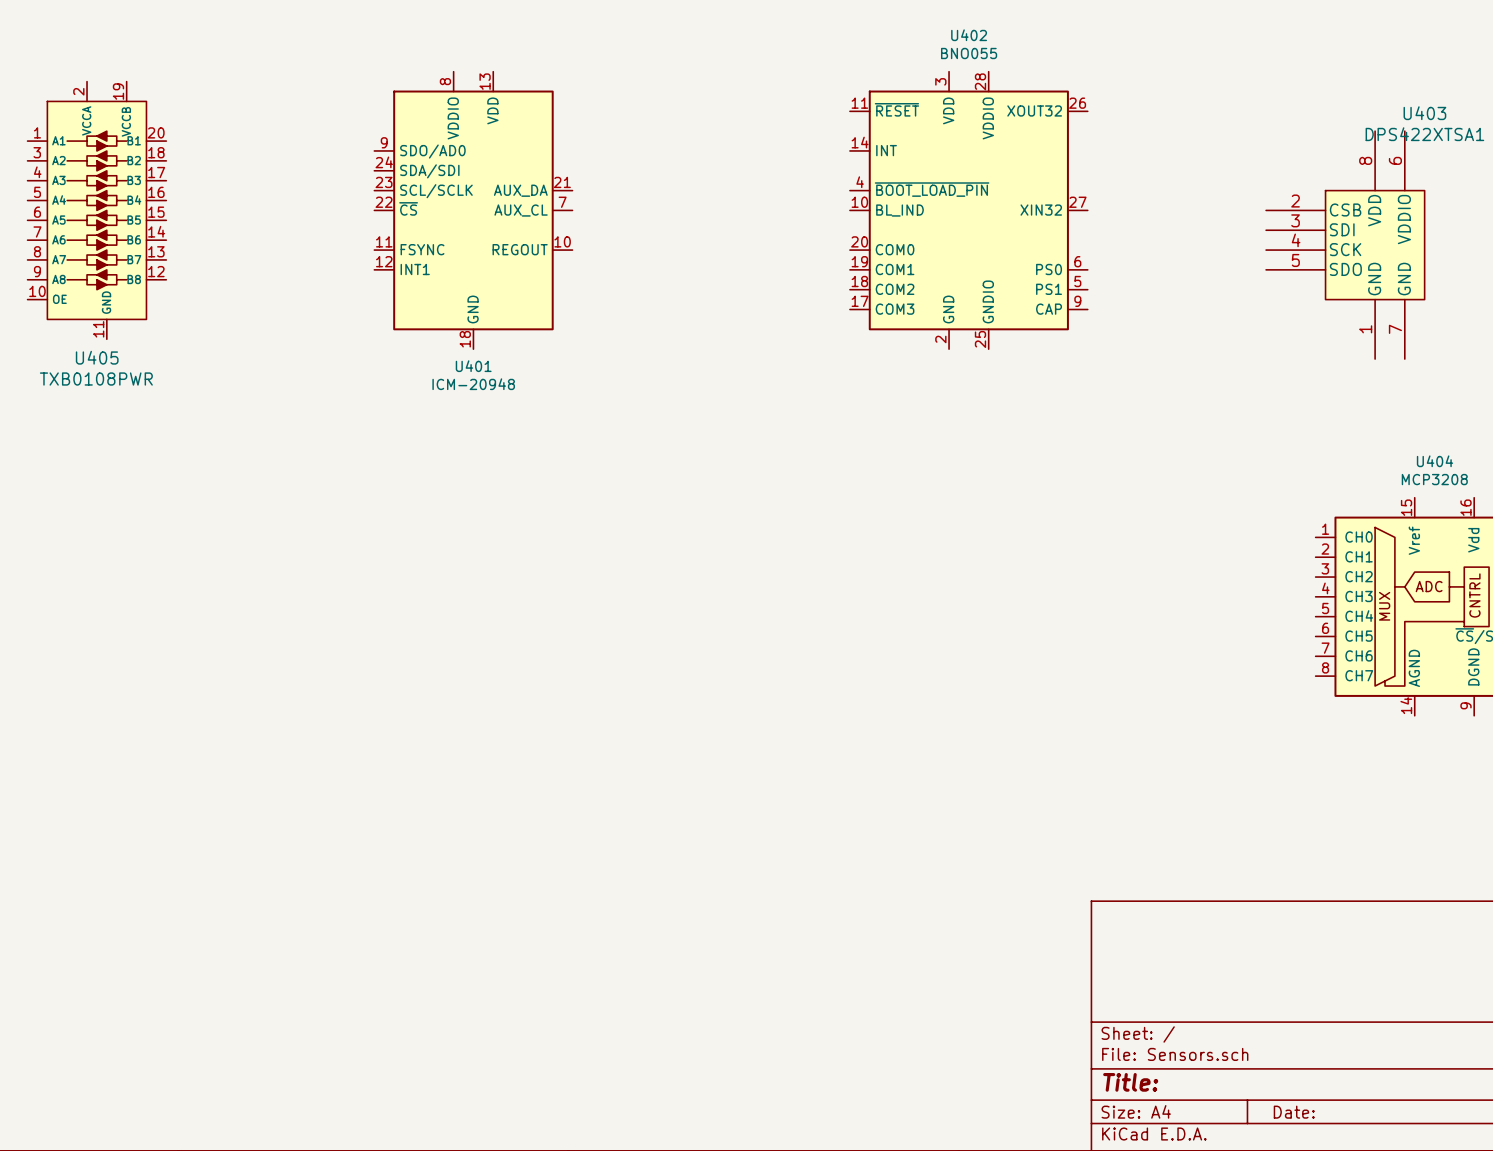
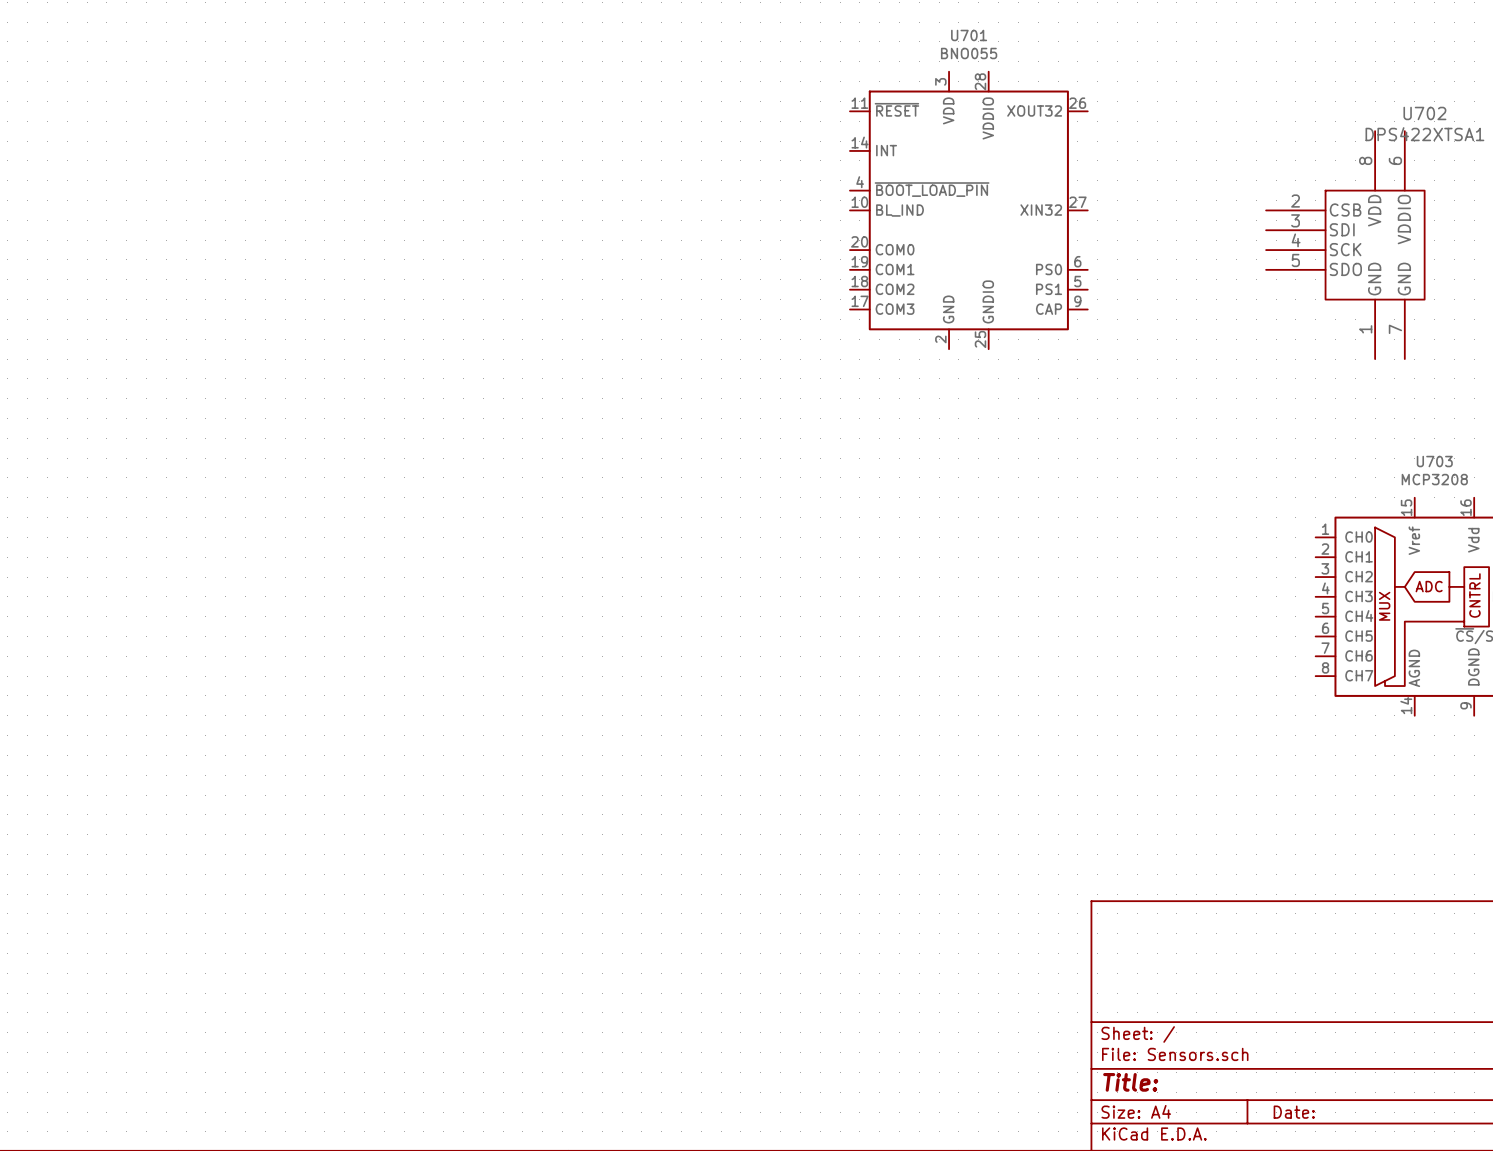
U402 name: U402 (969, 35) -> U701 (969, 35)
U403 name: U403 (1424, 113) -> U702 (1424, 113)
U405: TXB0108PWR (96, 210) -> none
U401: ICM-20948 (473, 210) -> none
U404 name: U404 (1435, 461) -> U703 (1434, 461)

